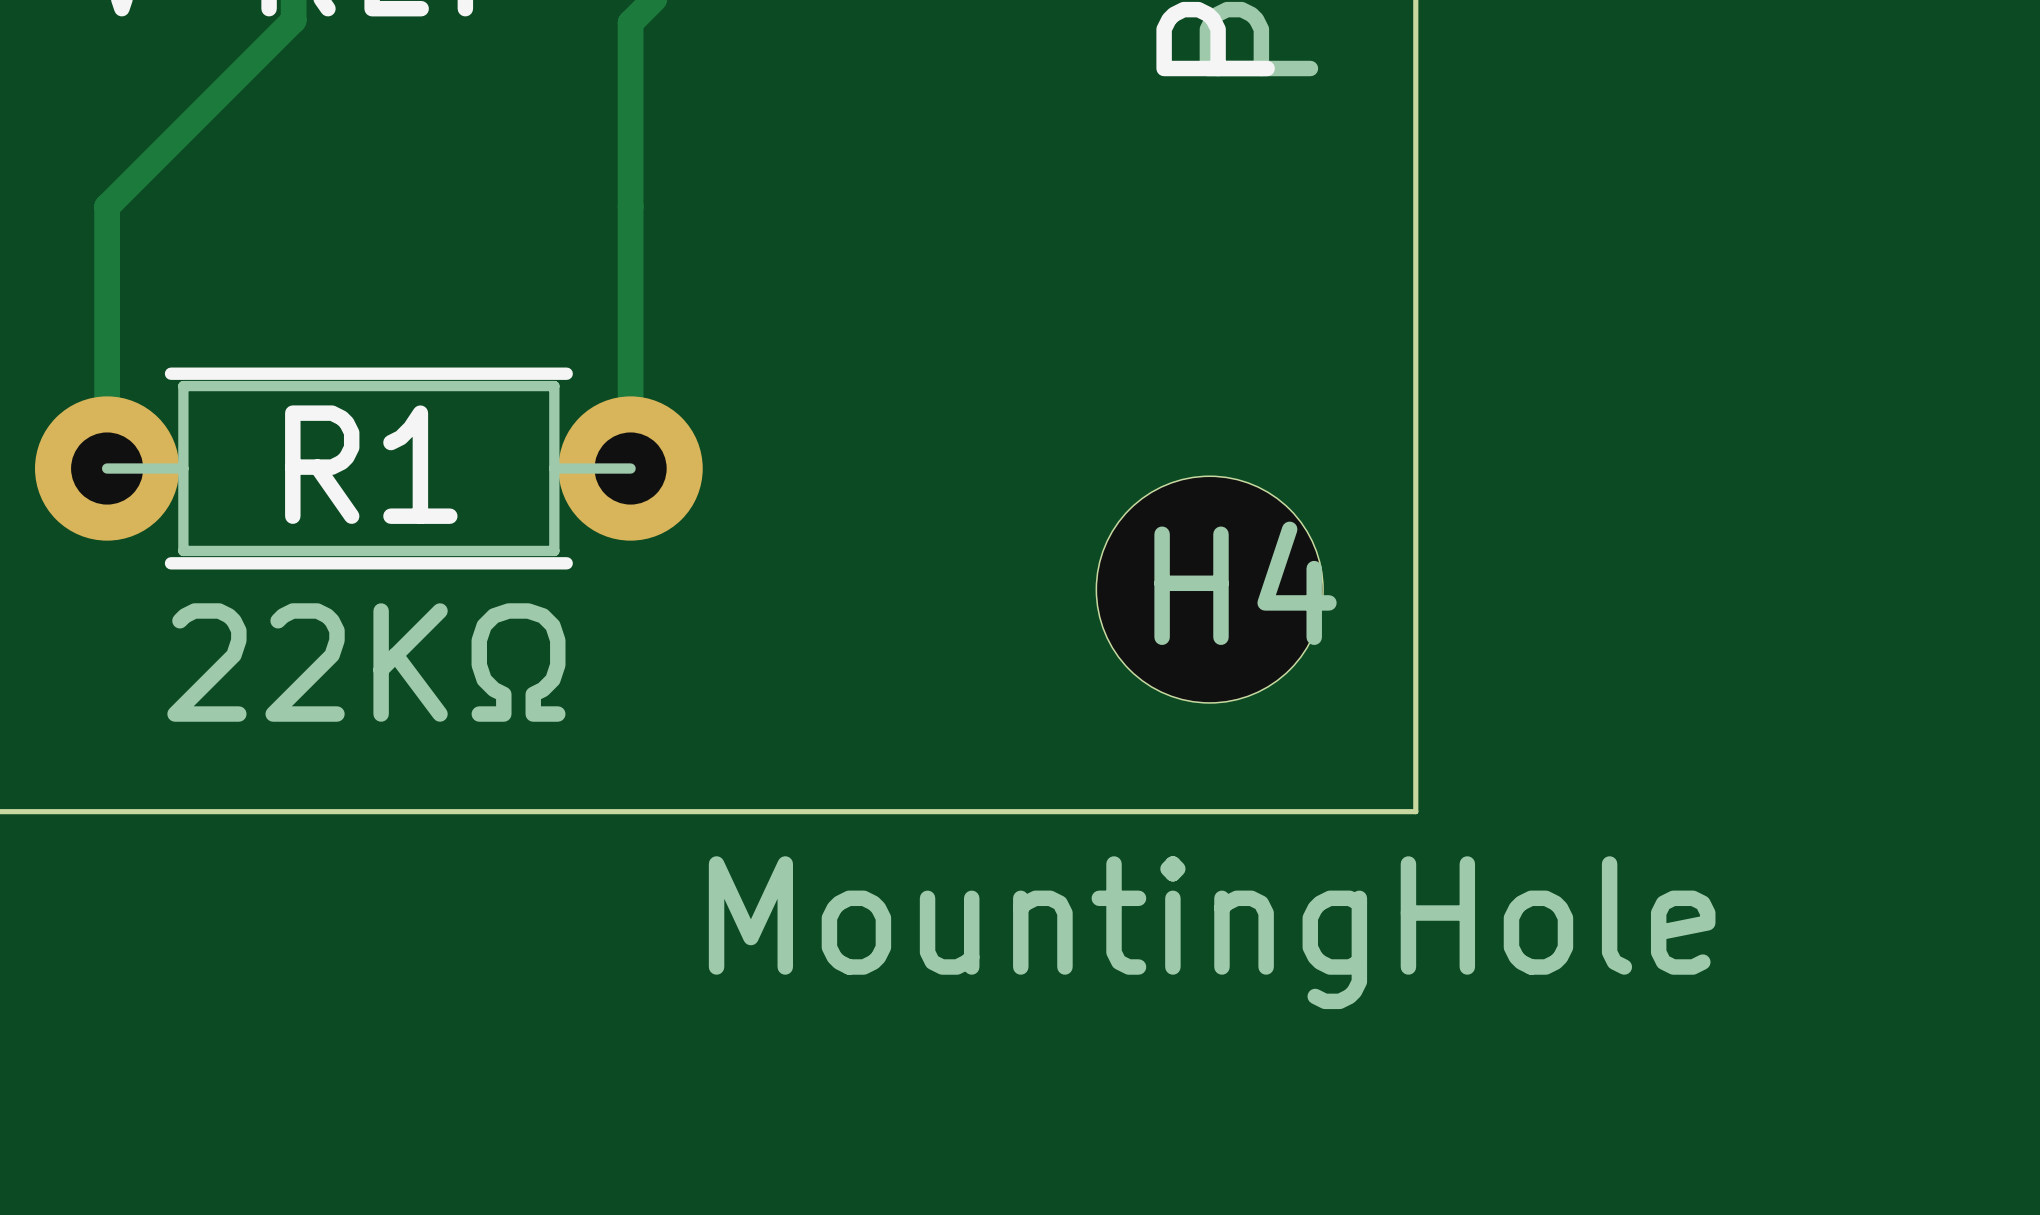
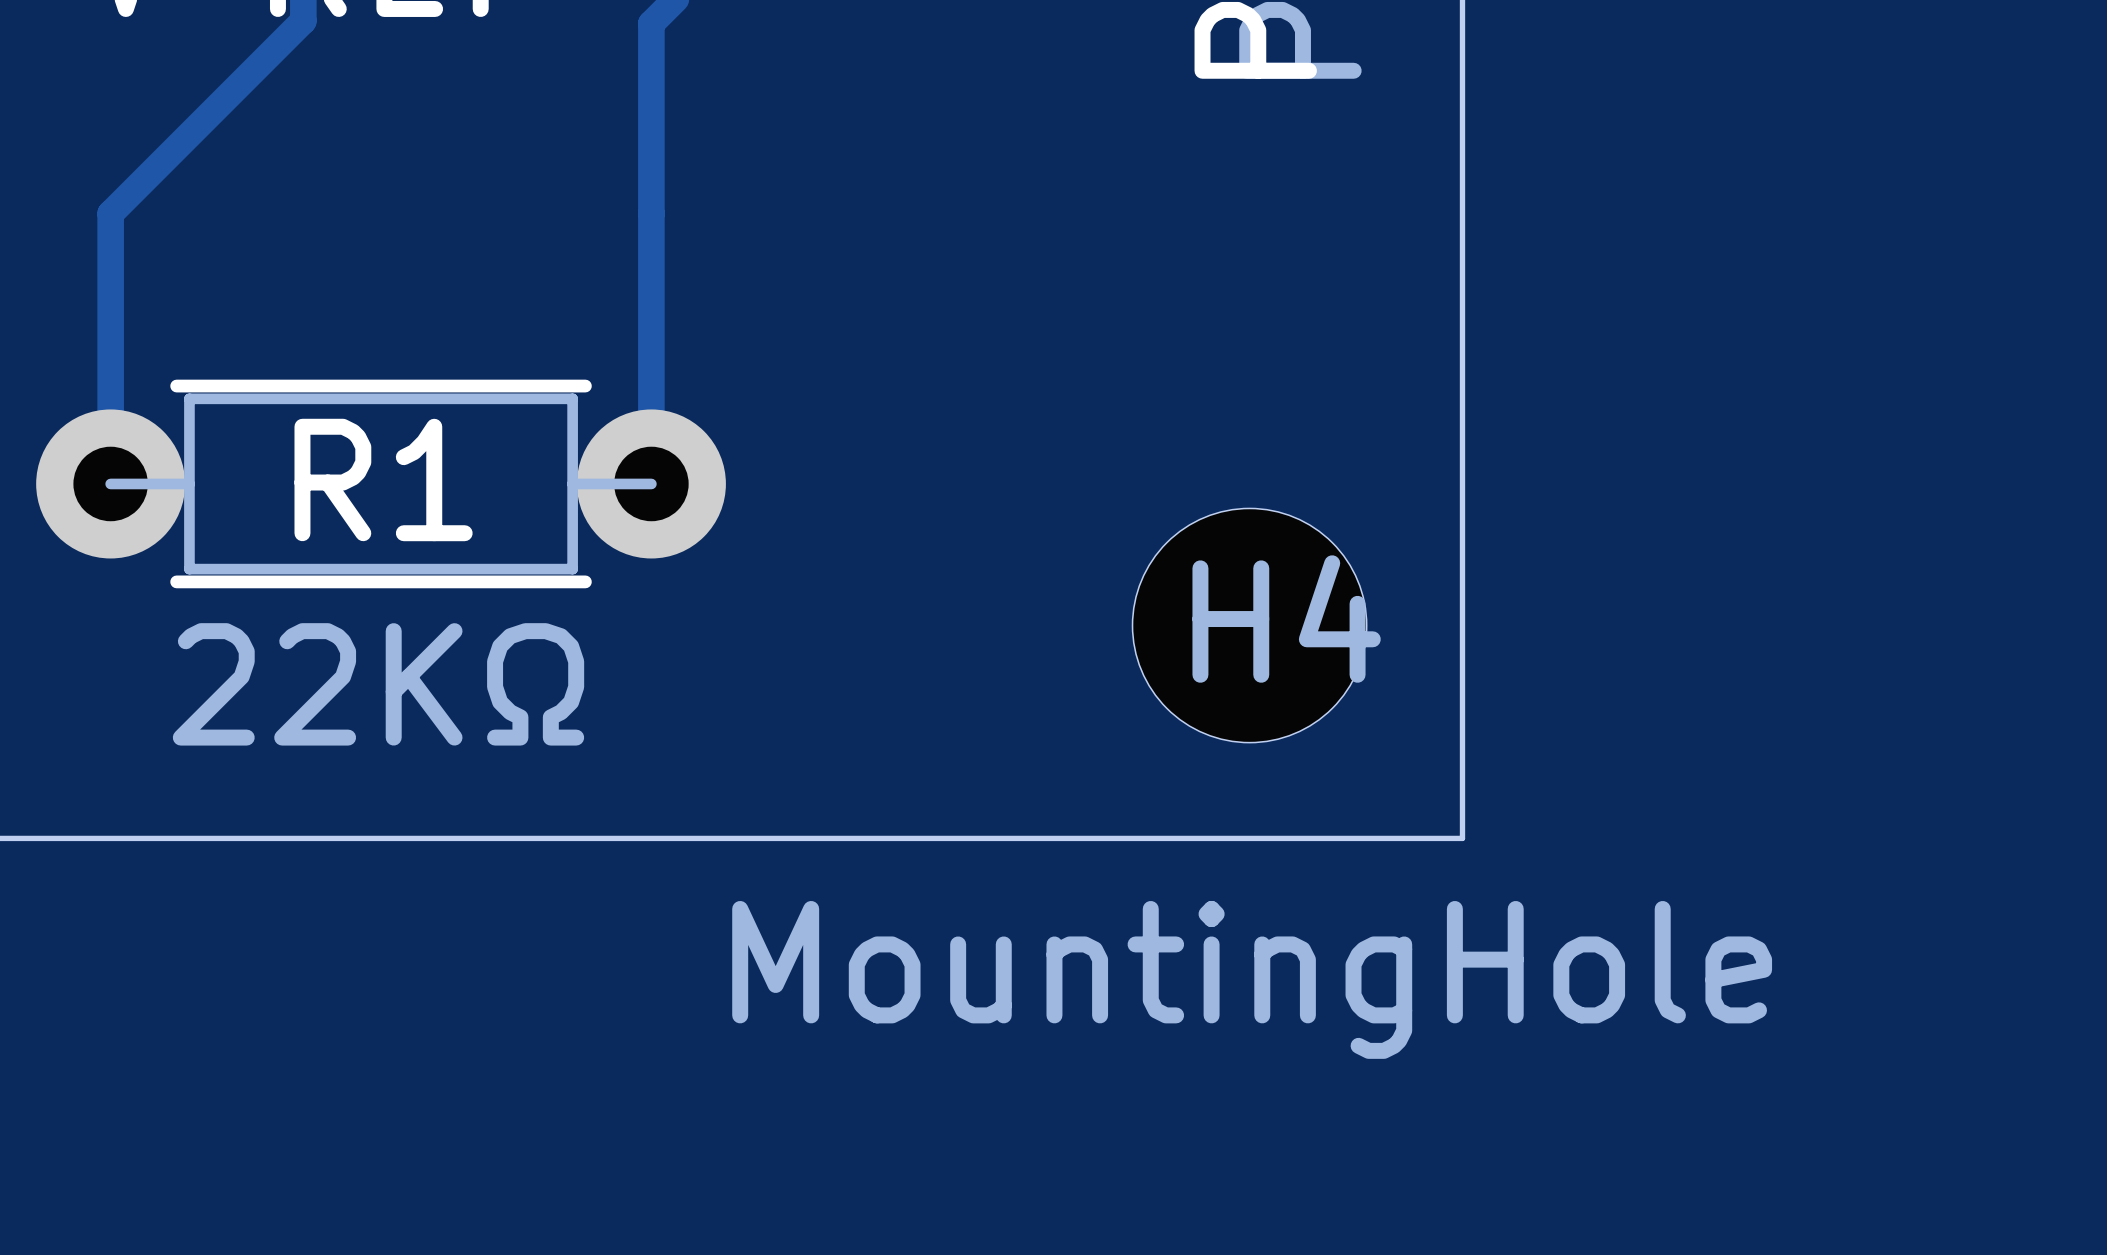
H4 position: (1209, 589) -> (1249, 625)

